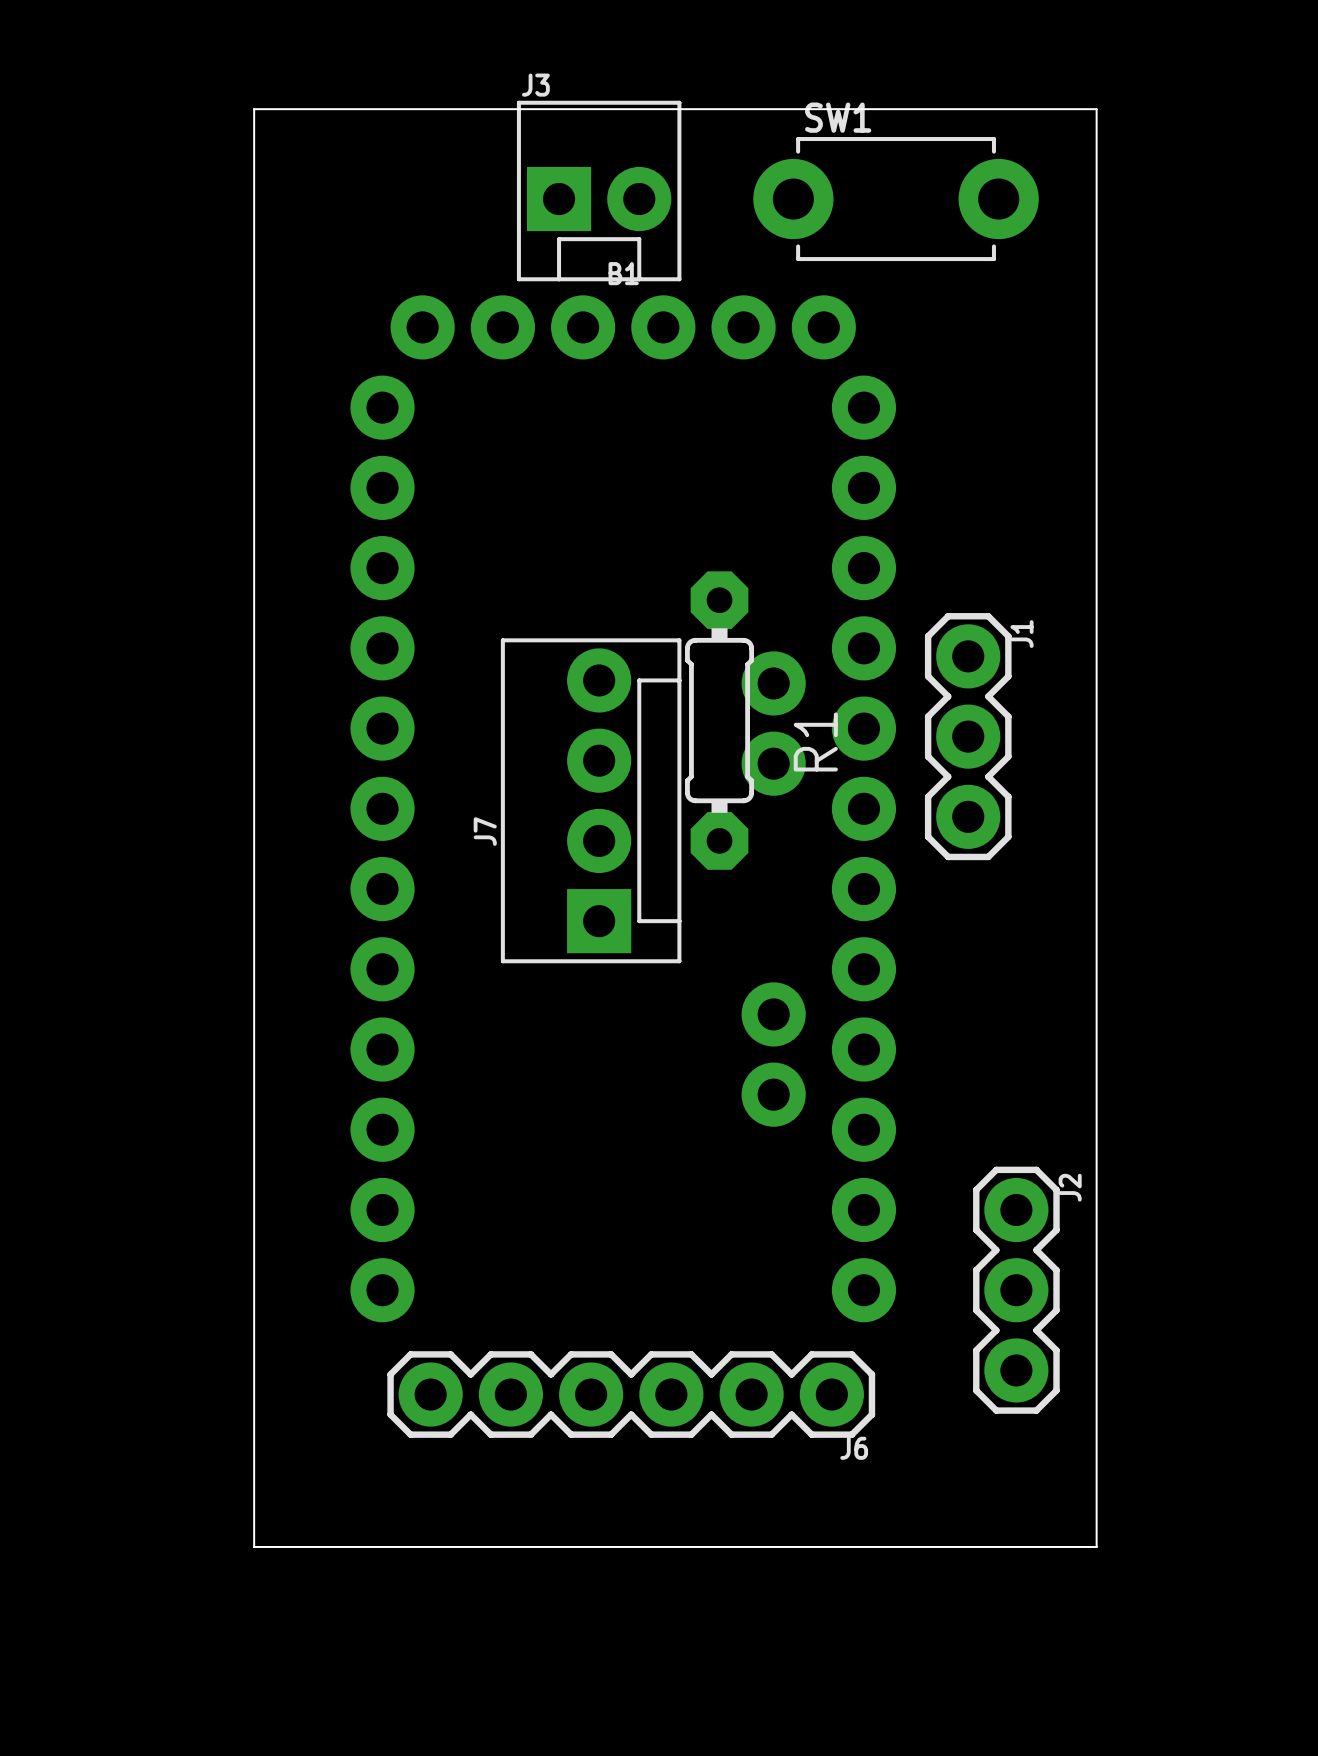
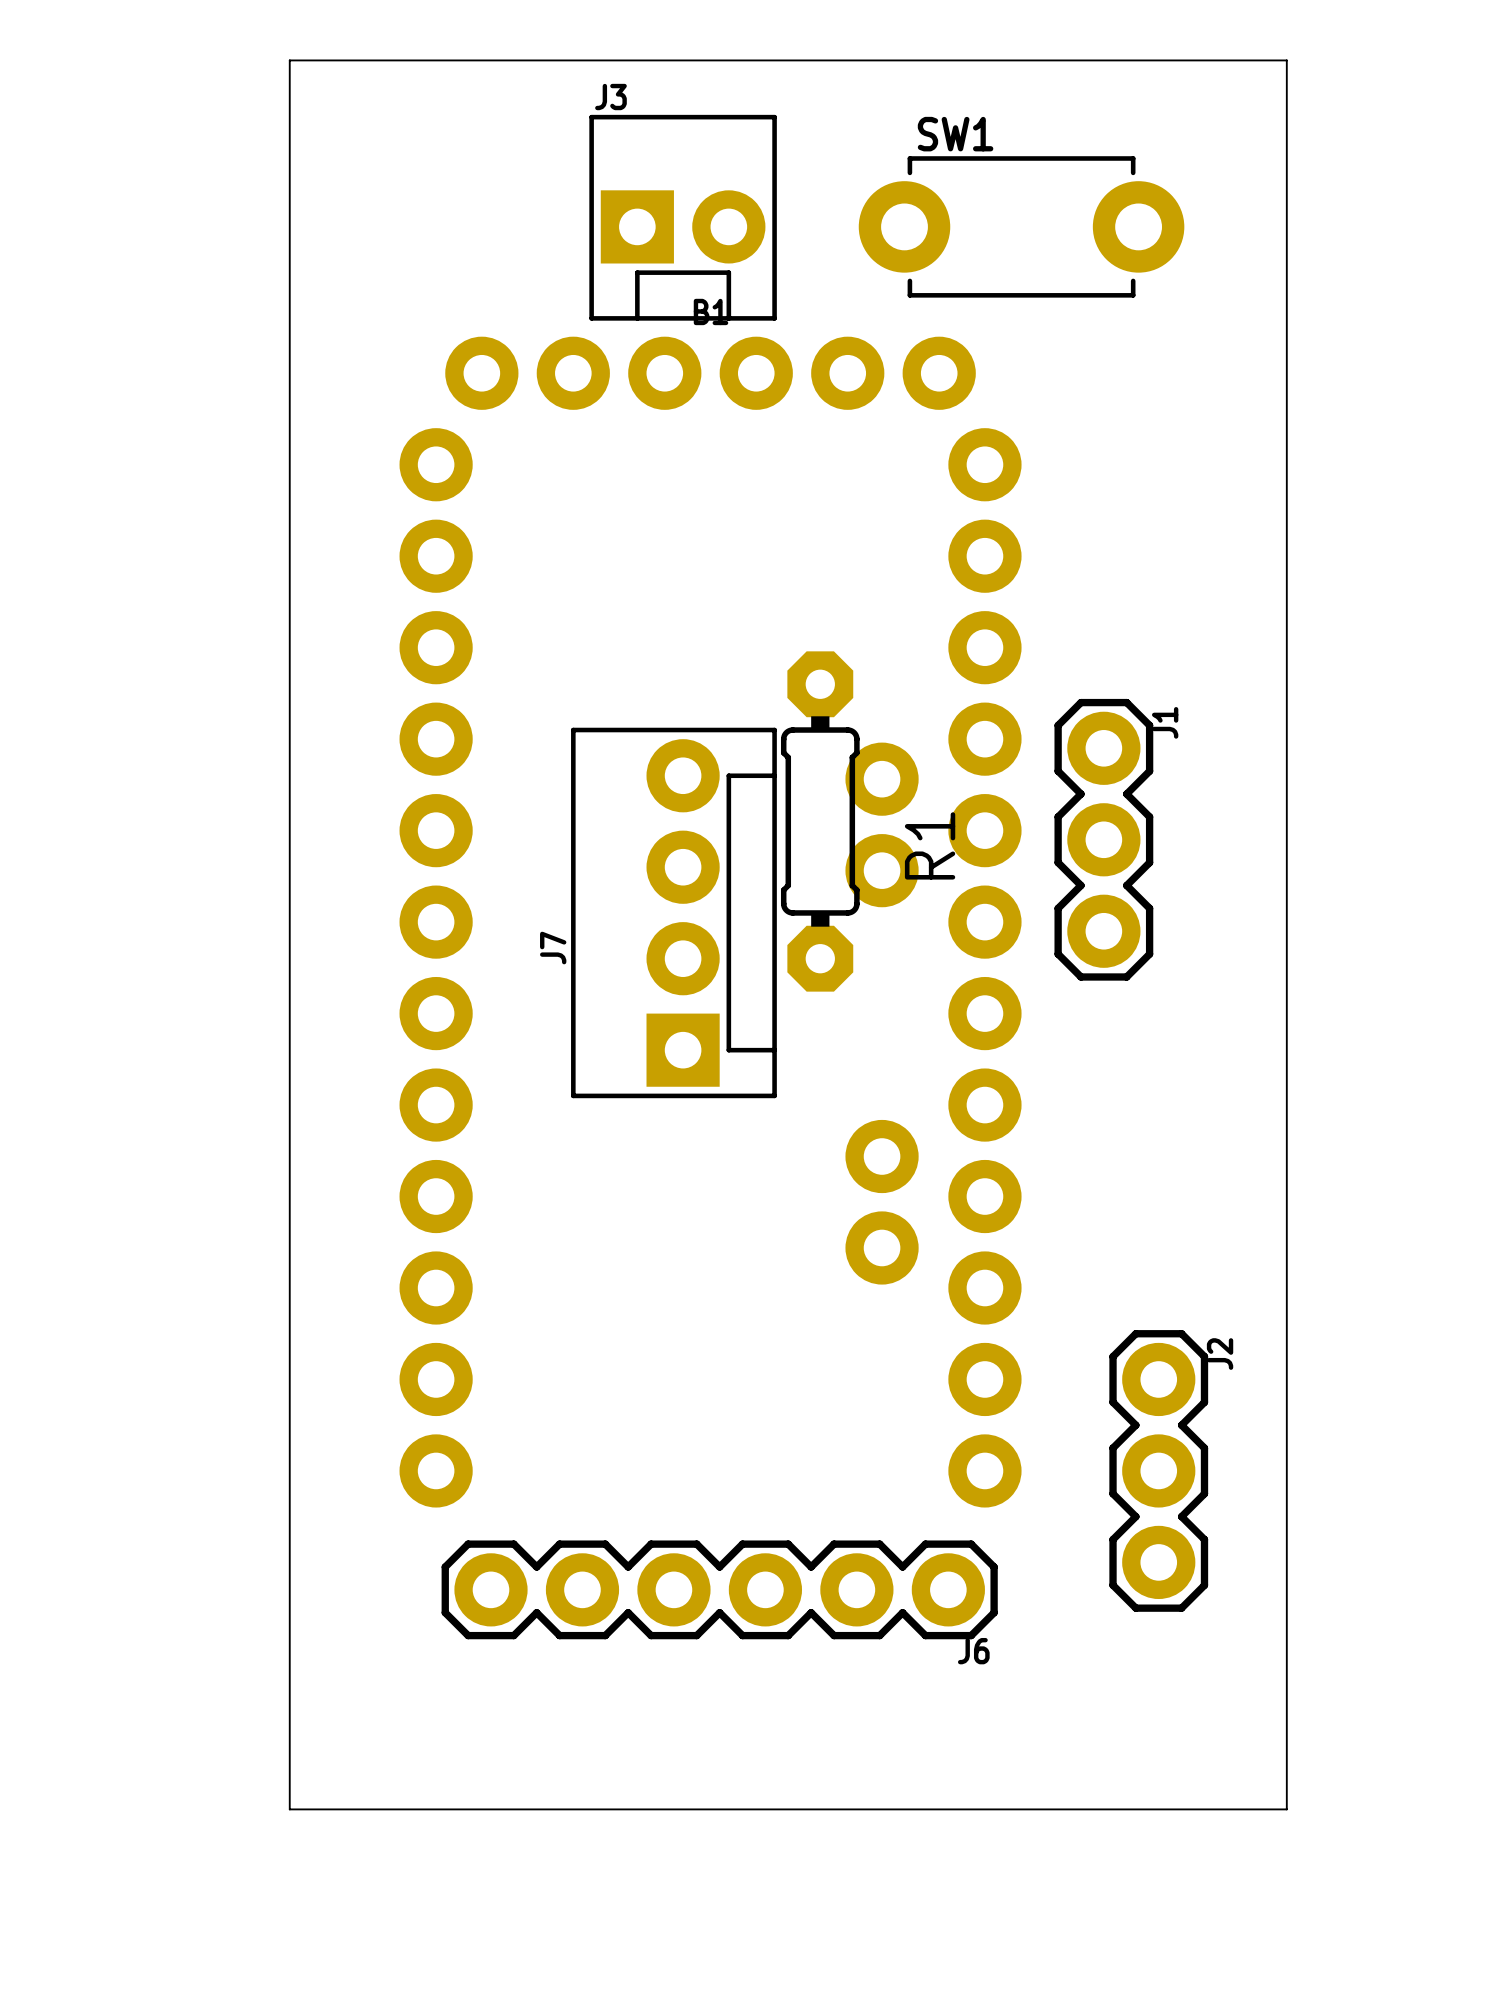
board edge: (254, 109) (1096, 109) (1096, 1546) (254, 1546) -> (289, 124) (289, 60) (1286, 60) (1286, 1809) (289, 1809) (289, 1763)

